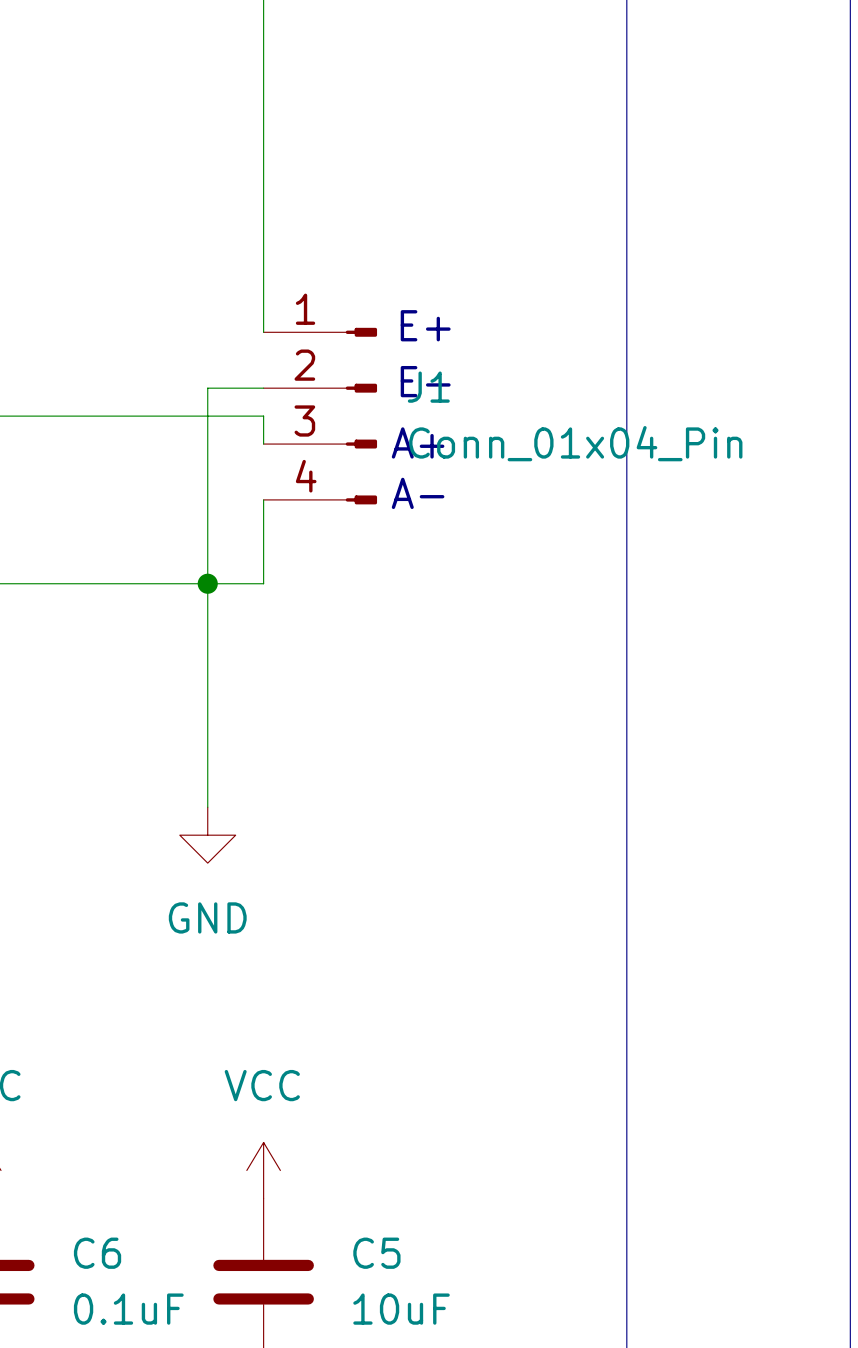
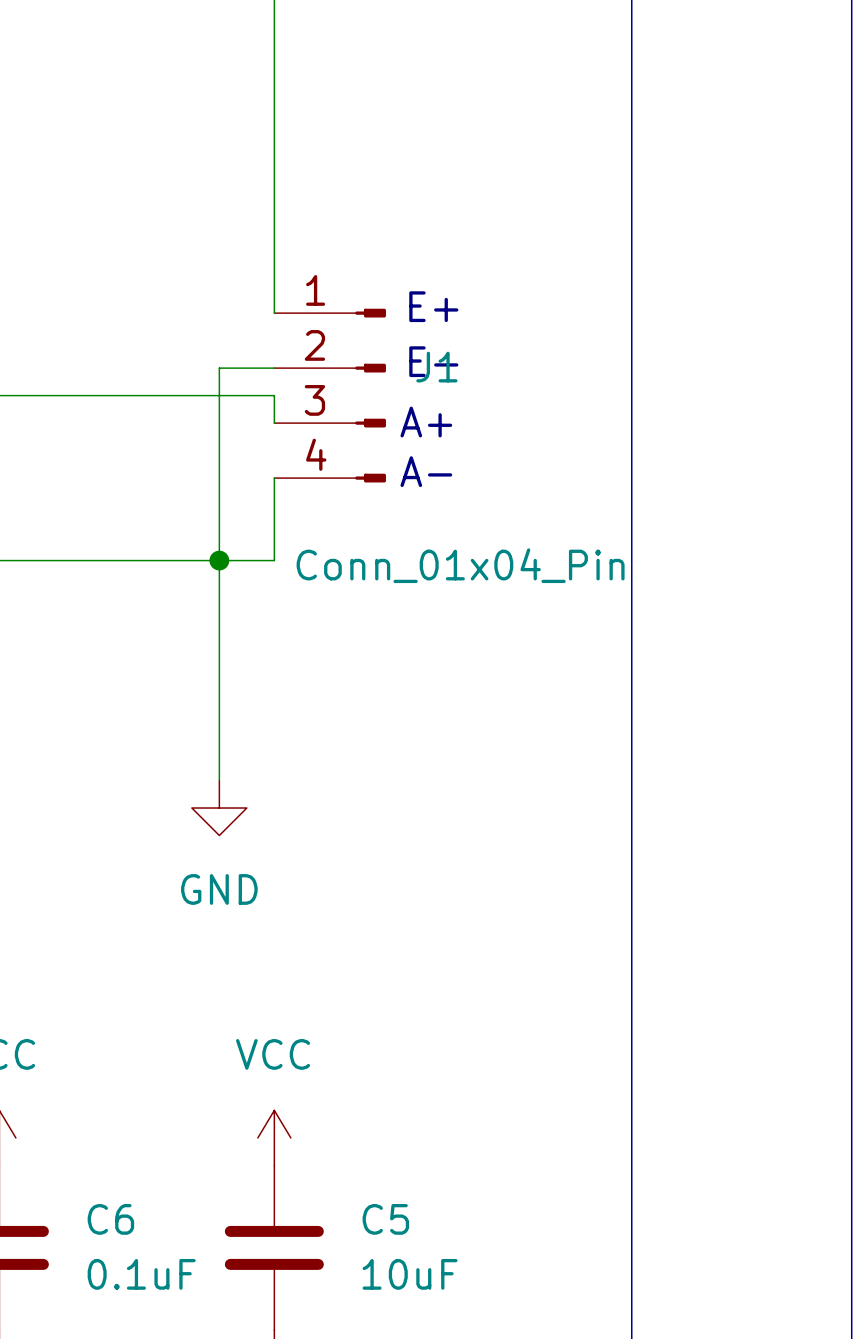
J1 value position: Conn_01x04_Pin (575, 443) -> Conn_01x04_Pin (460, 565)

